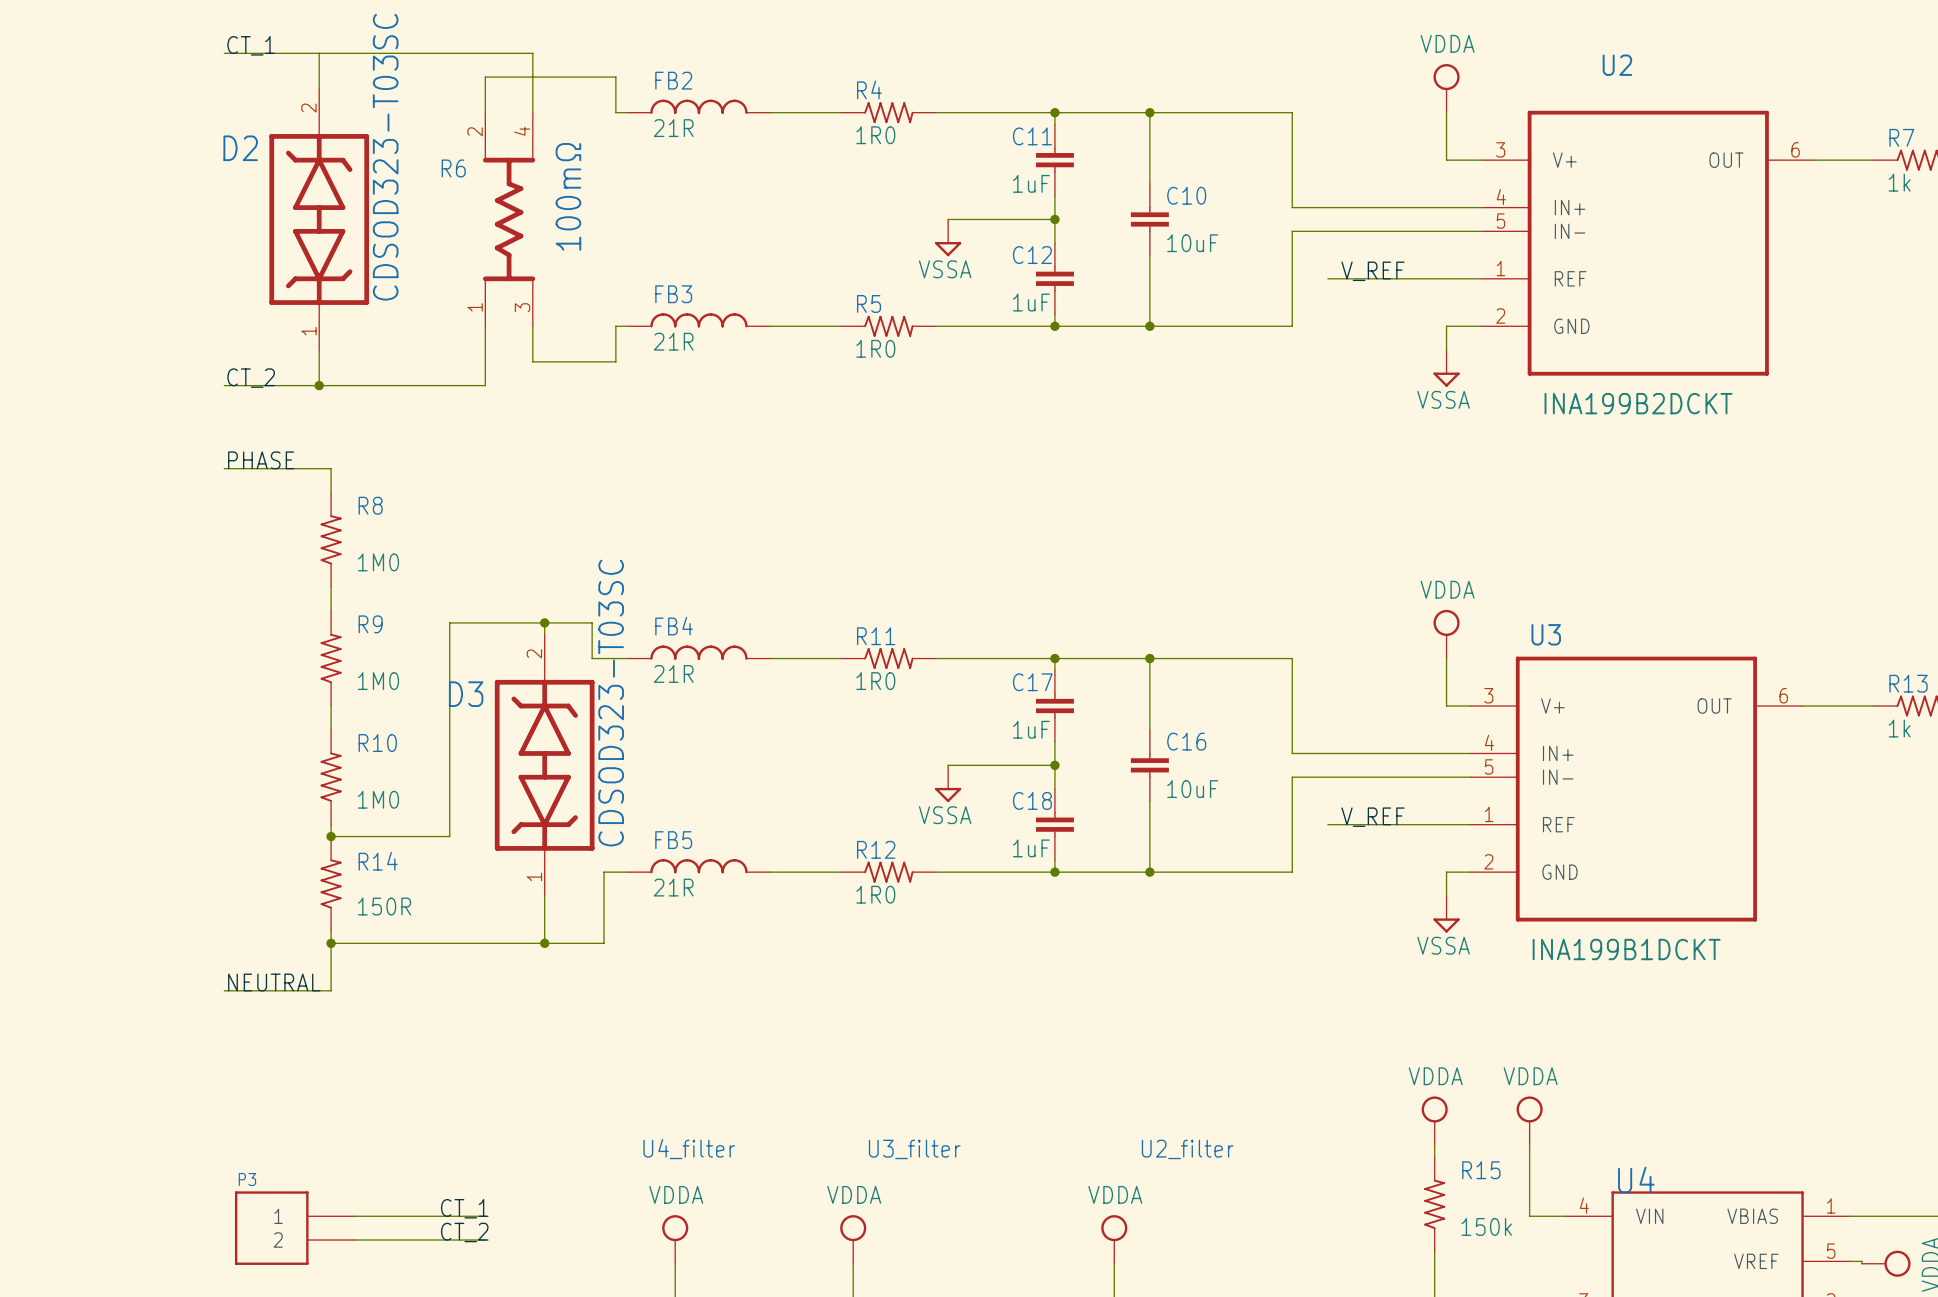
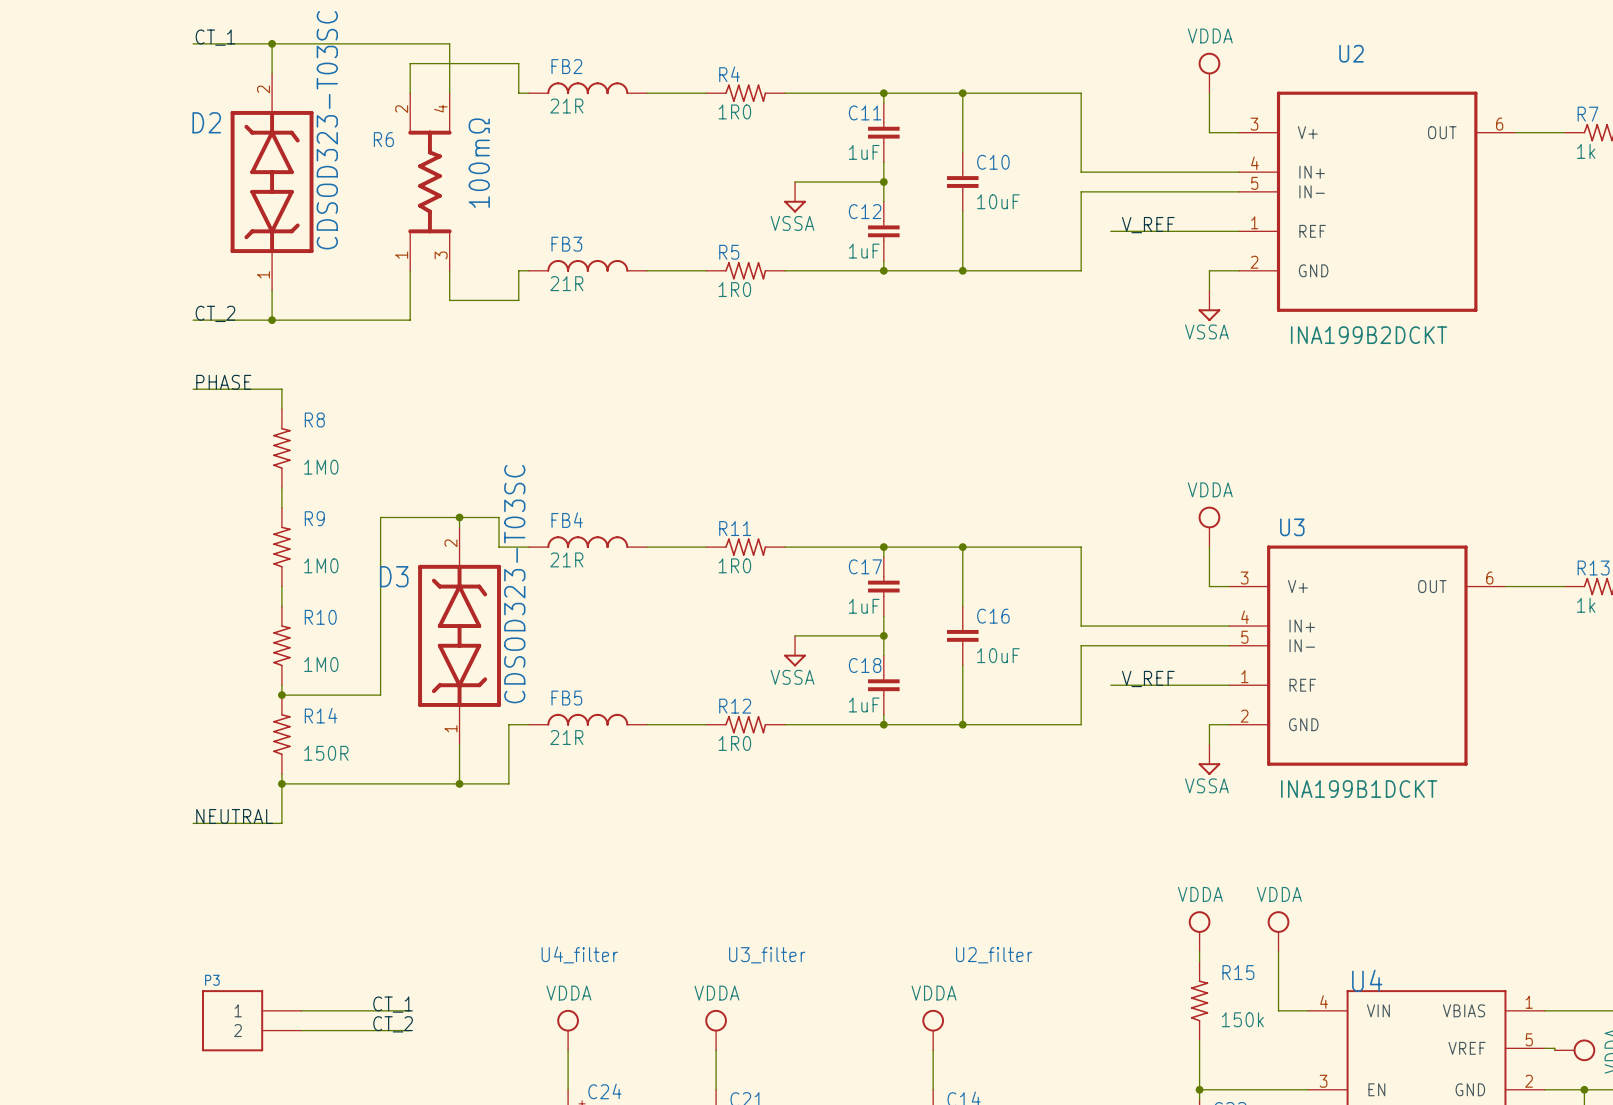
junction: none -> (272, 43)

